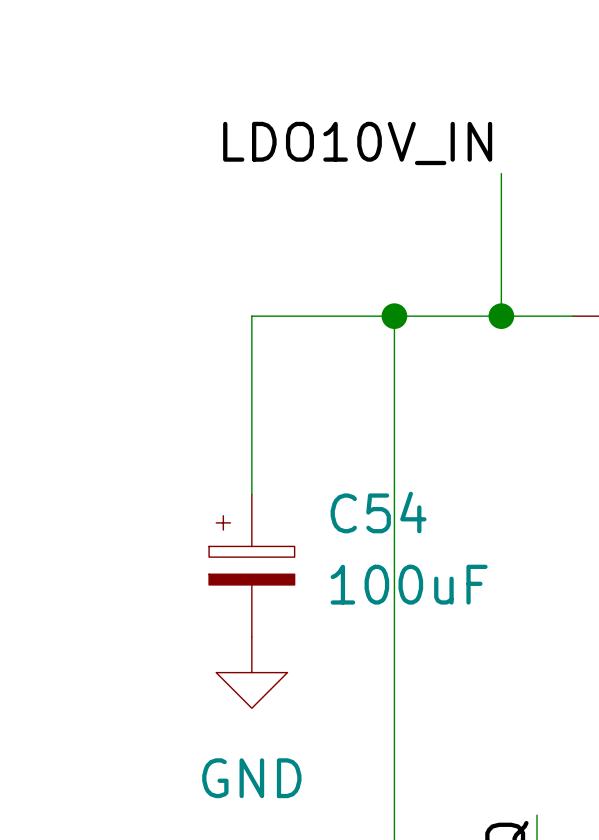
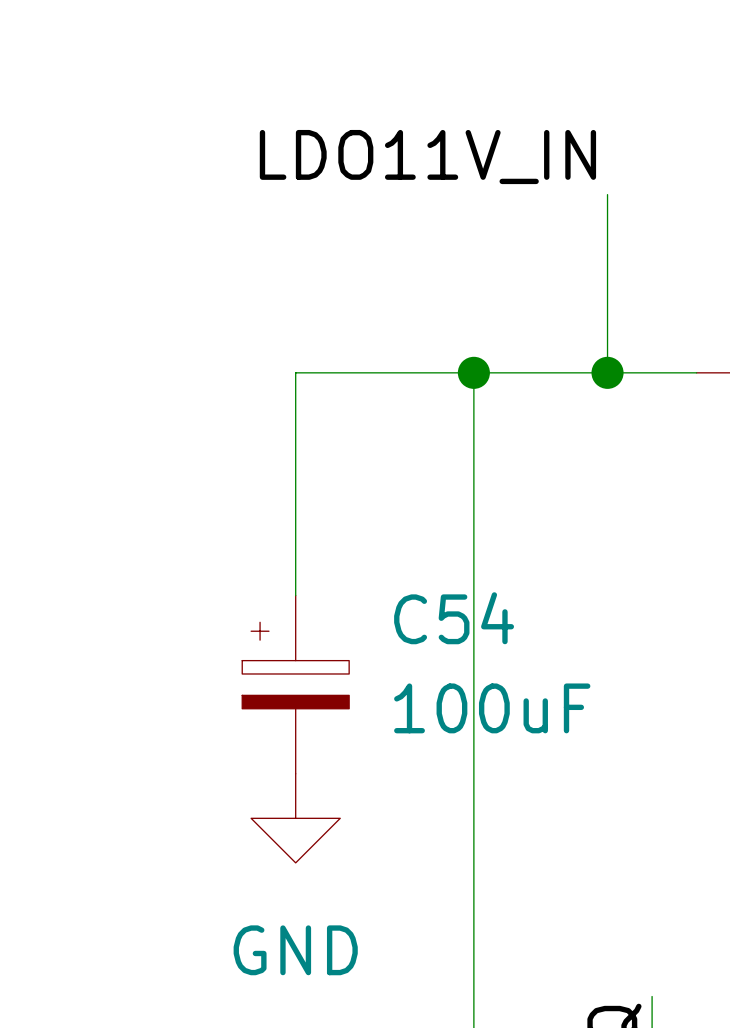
label: LDO10V_IN (357, 143) -> LDO11V_IN (427, 157)

